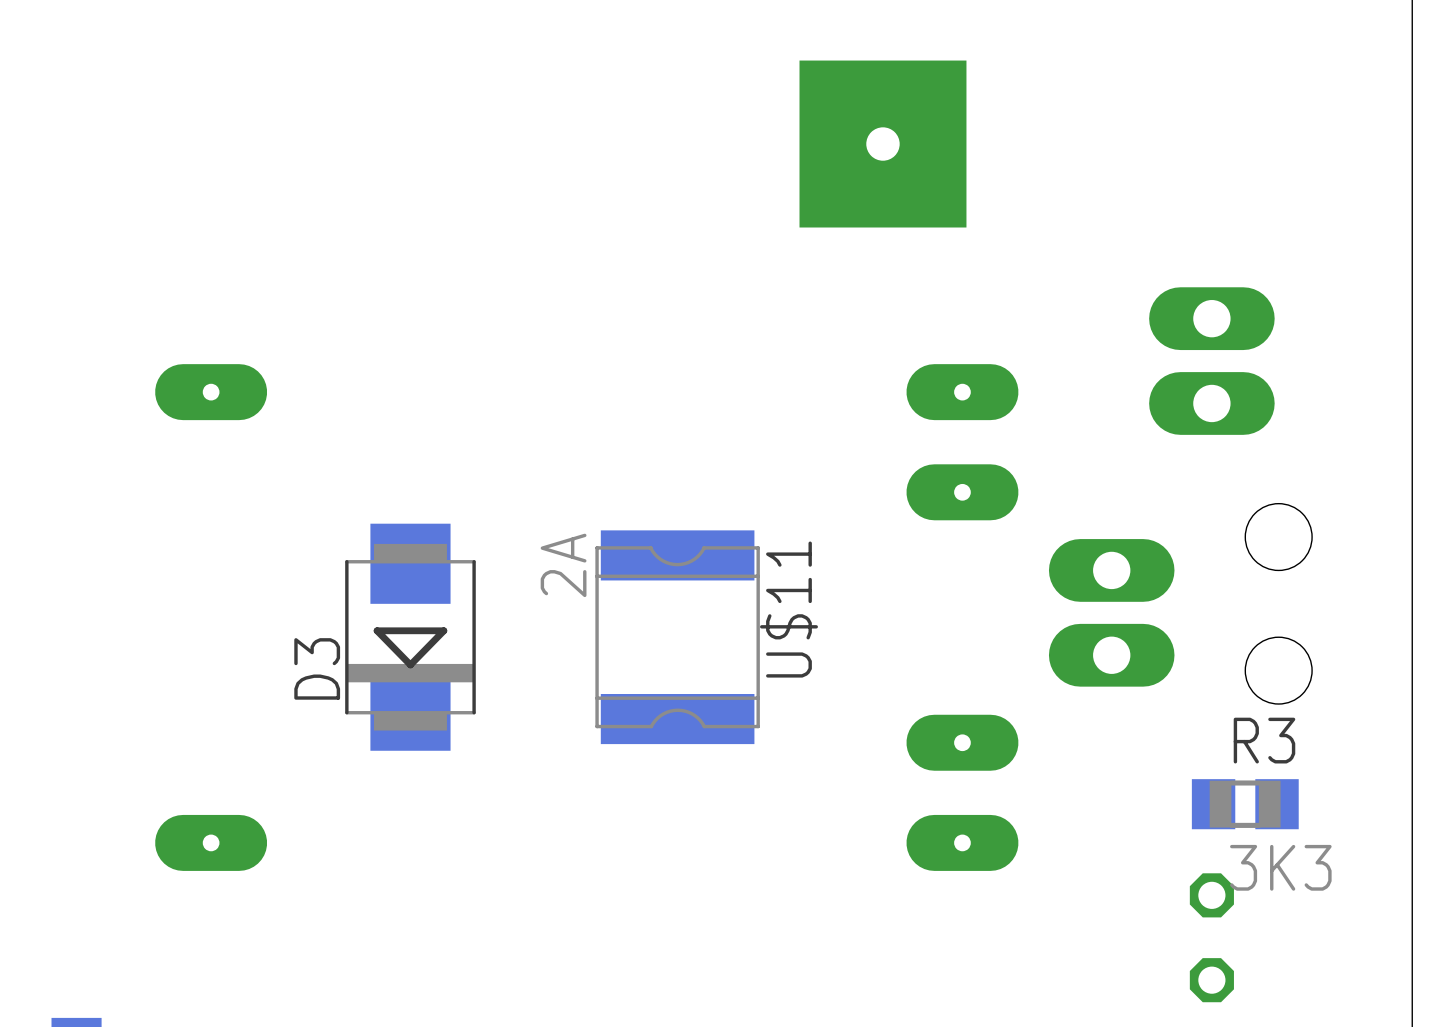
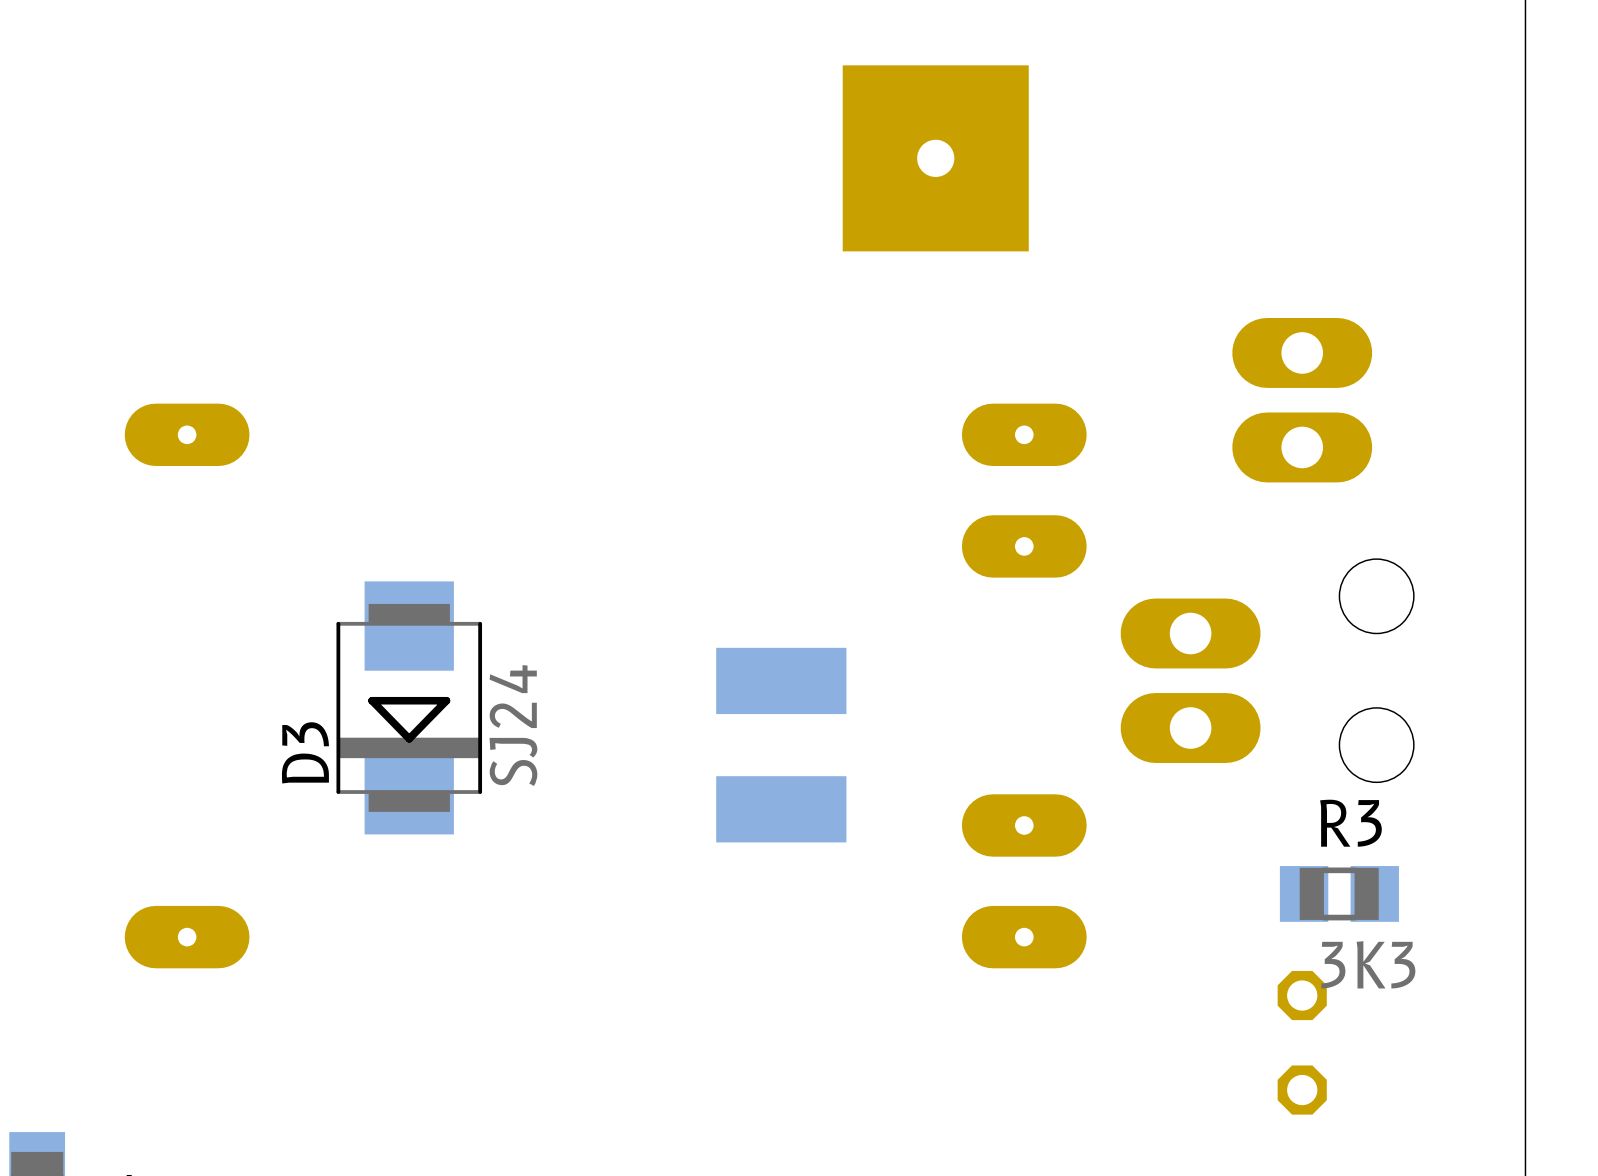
D3 value: none -> SJ24 (513, 725)
U$11: 2A (677, 637) -> none
part: none -> (781, 745)

